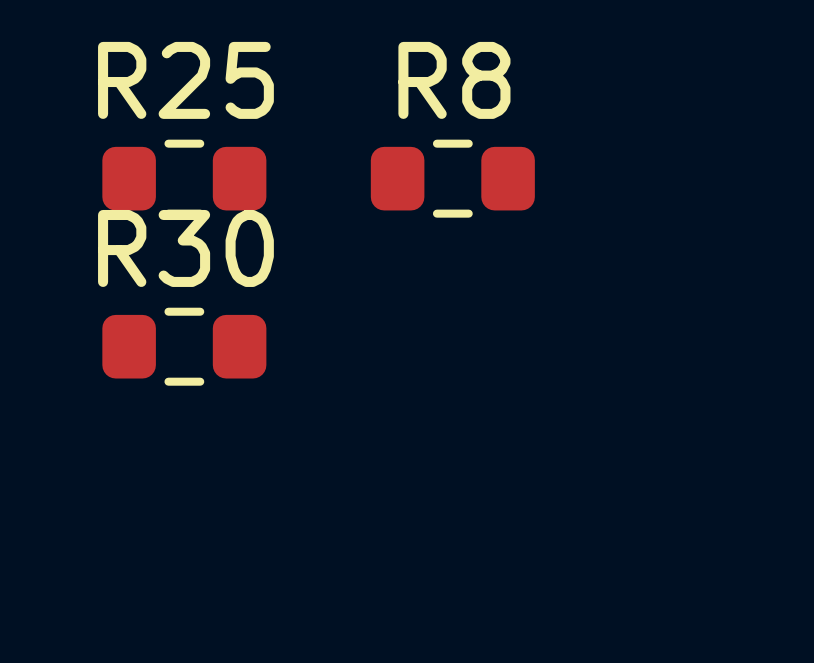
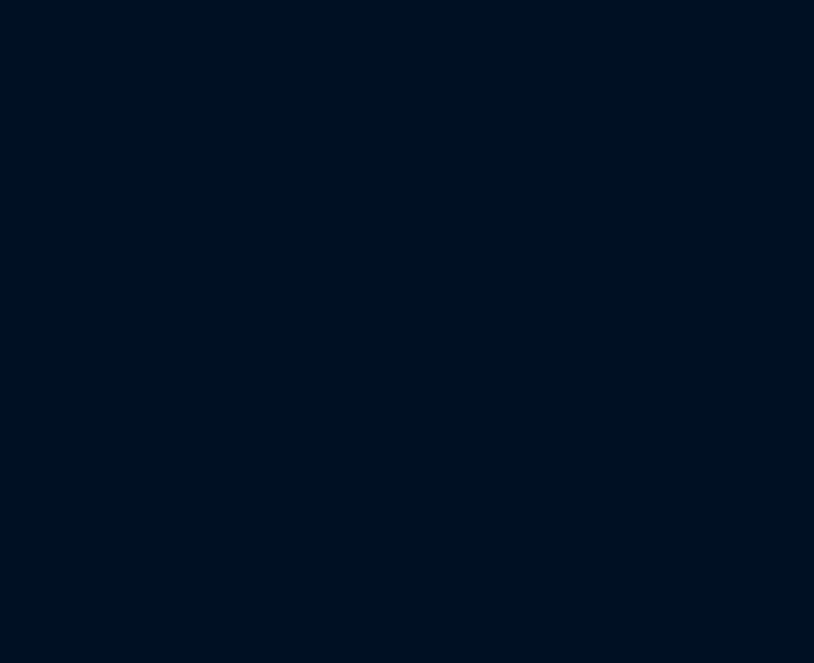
R25: (184, 178) -> none
R8: (452, 178) -> none
R30: (184, 346) -> none

